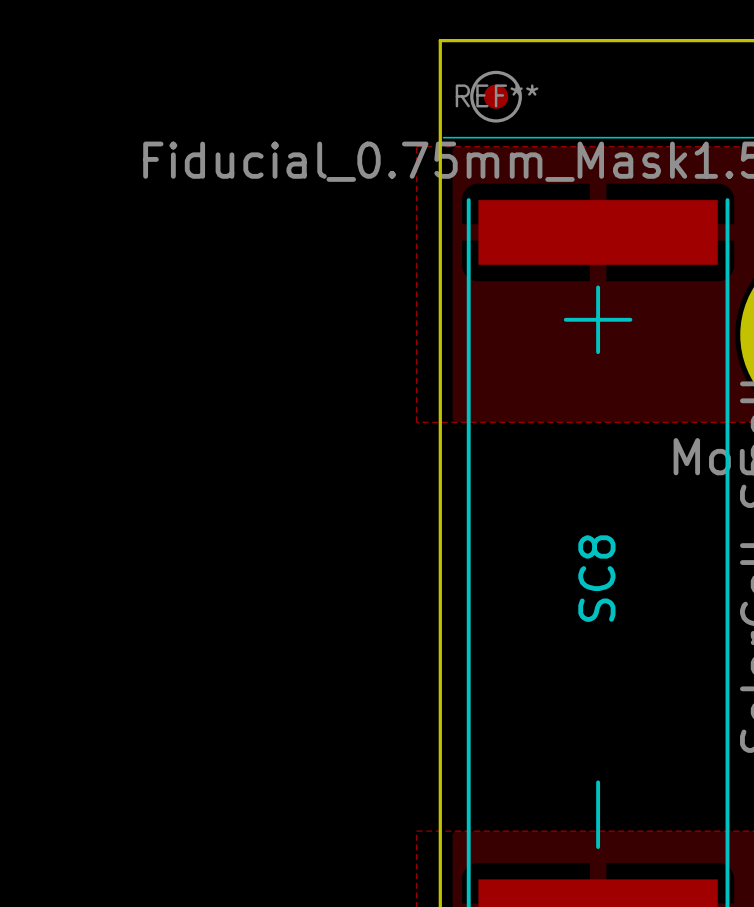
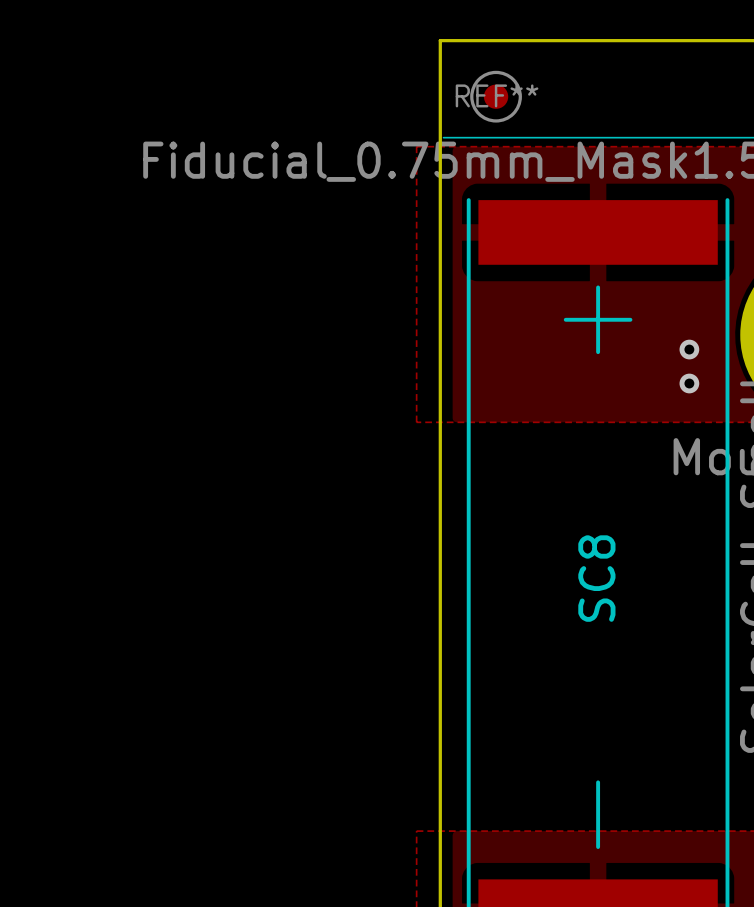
via: none -> (689, 349)
via: none -> (689, 383)

